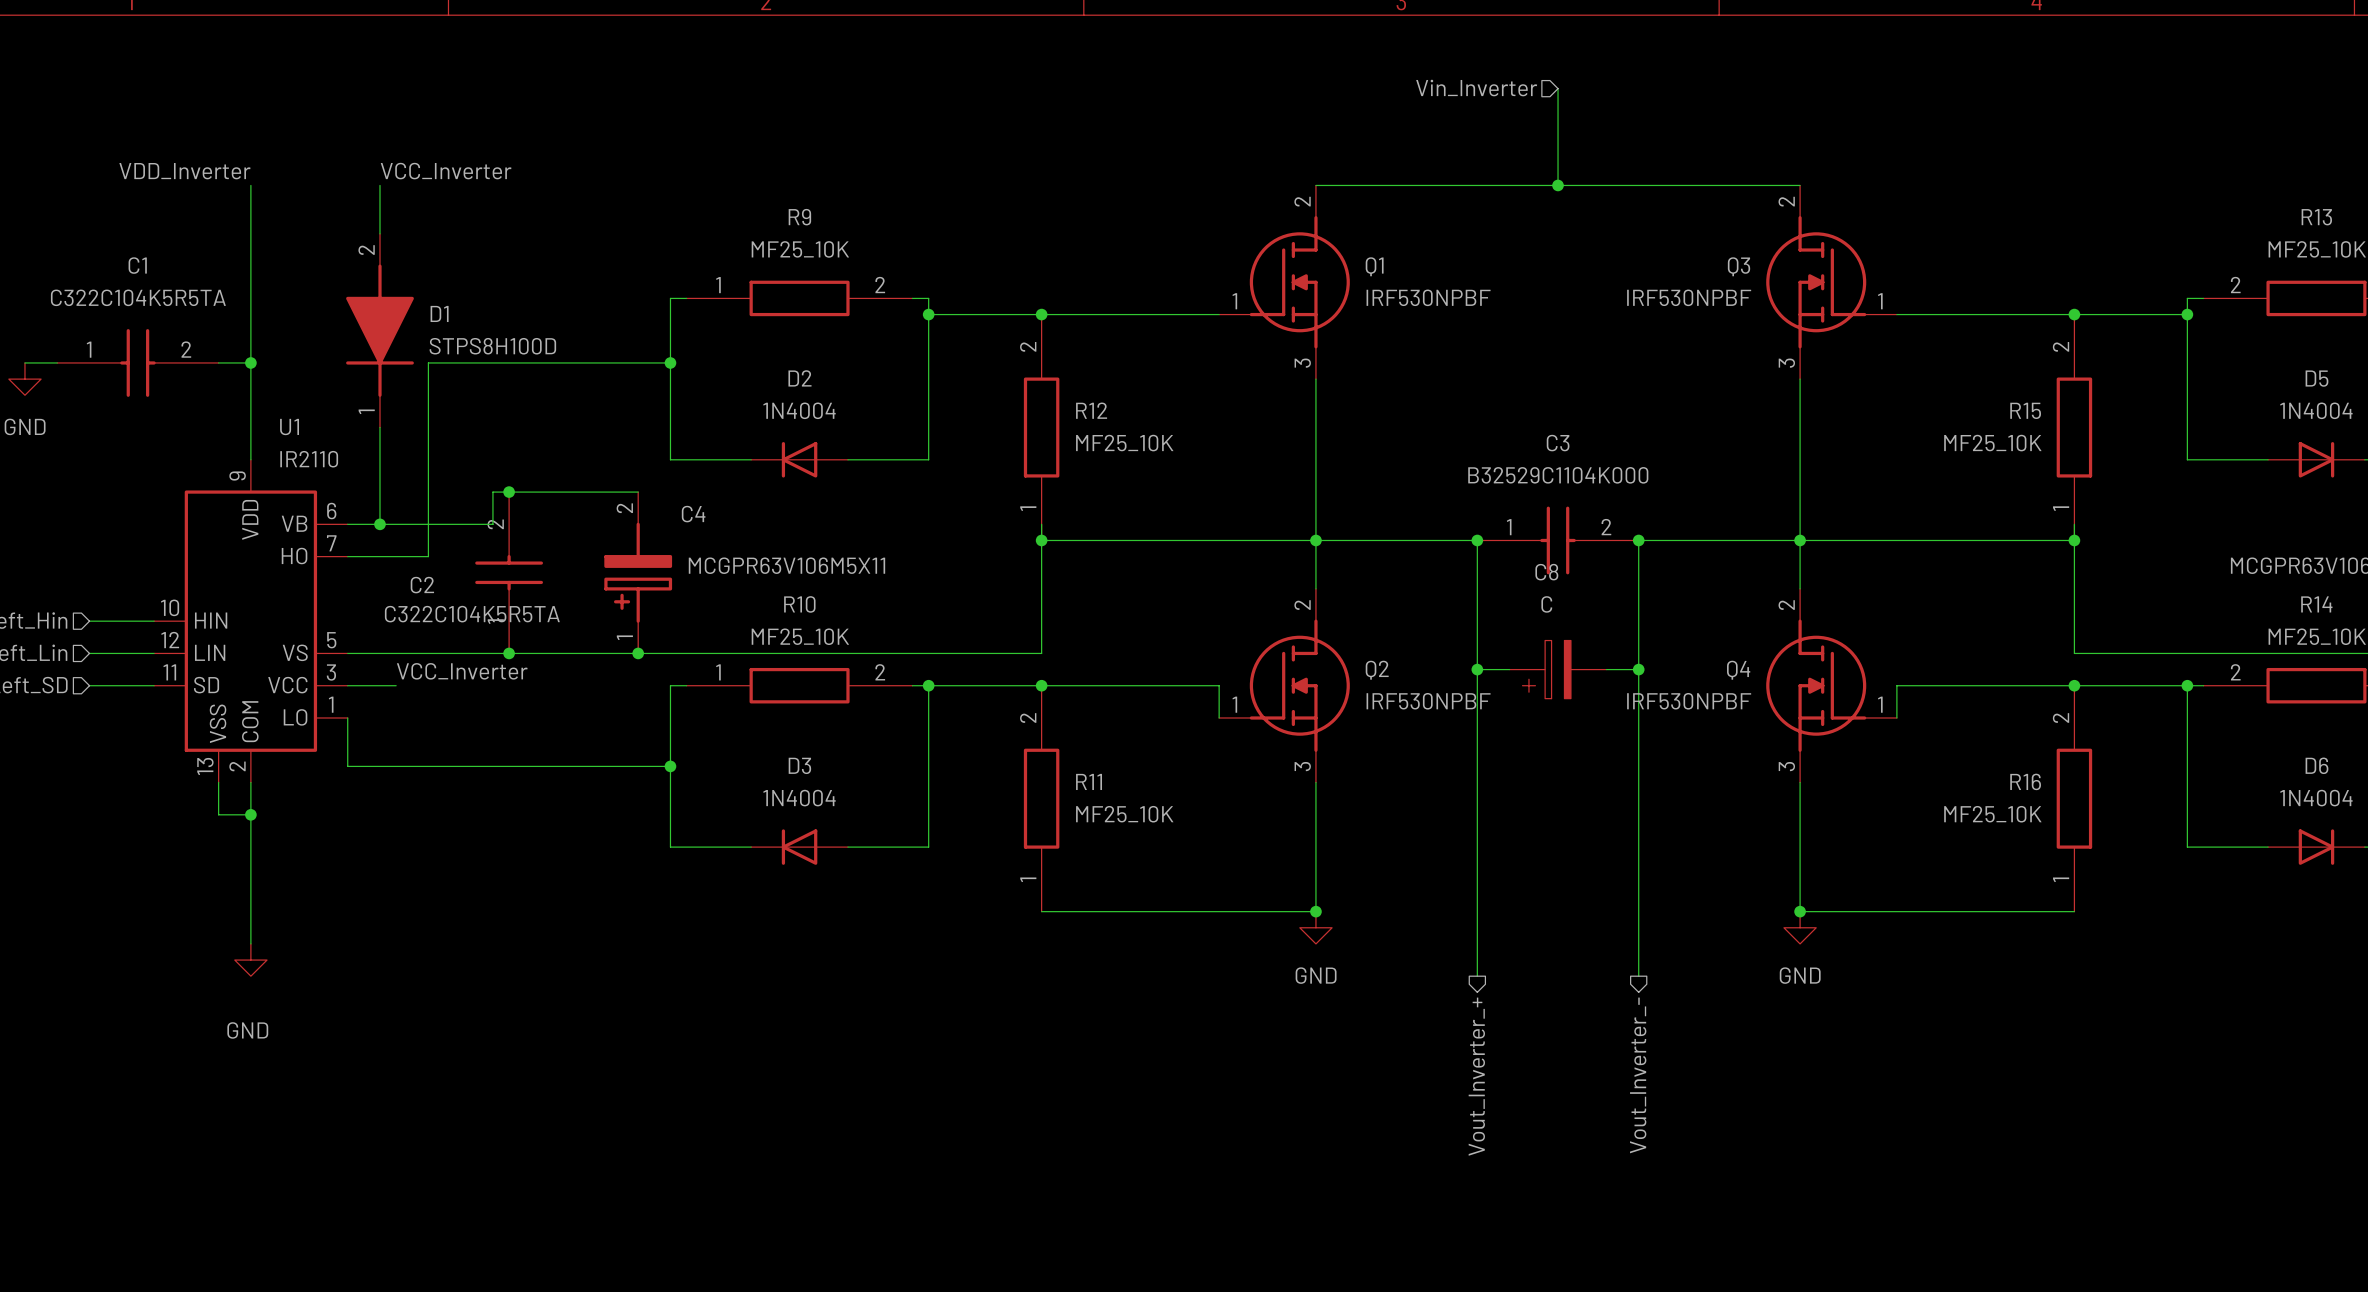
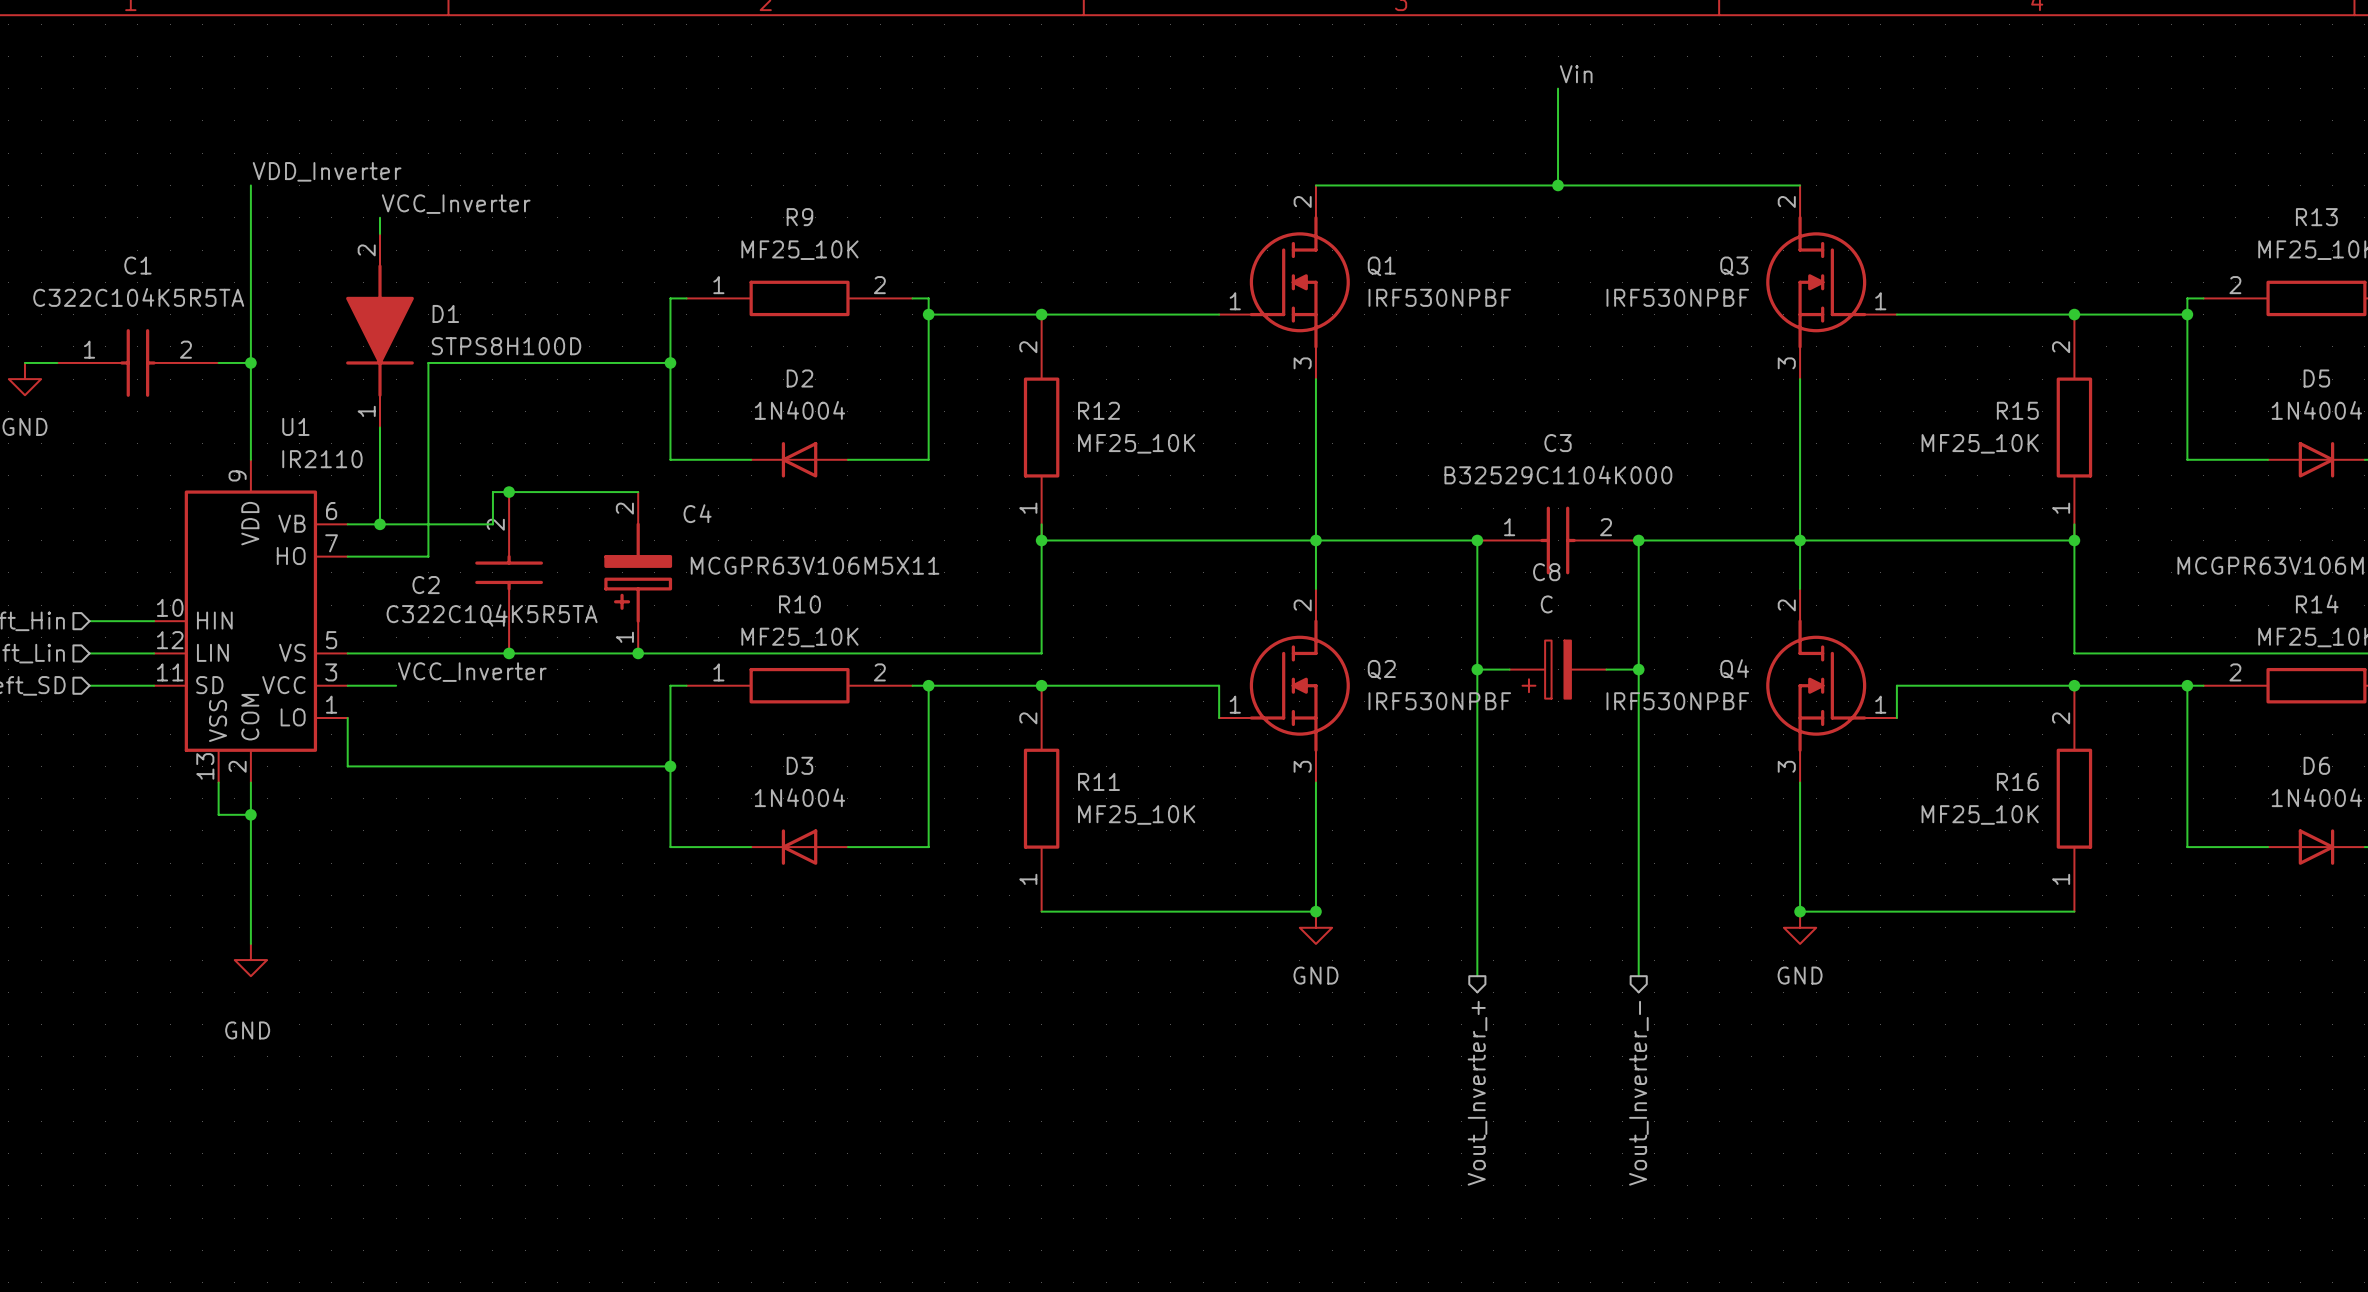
label: none -> Vin (1576, 74)
hierarchical label: Vin_Inverter (1476, 88) -> none
label position: VDD_Inverter (184, 171) -> VDD_Inverter (327, 171)
label position: VCC_Inverter (446, 171) -> VCC_Inverter (456, 204)
wire: (380, 185) (380, 217) -> none

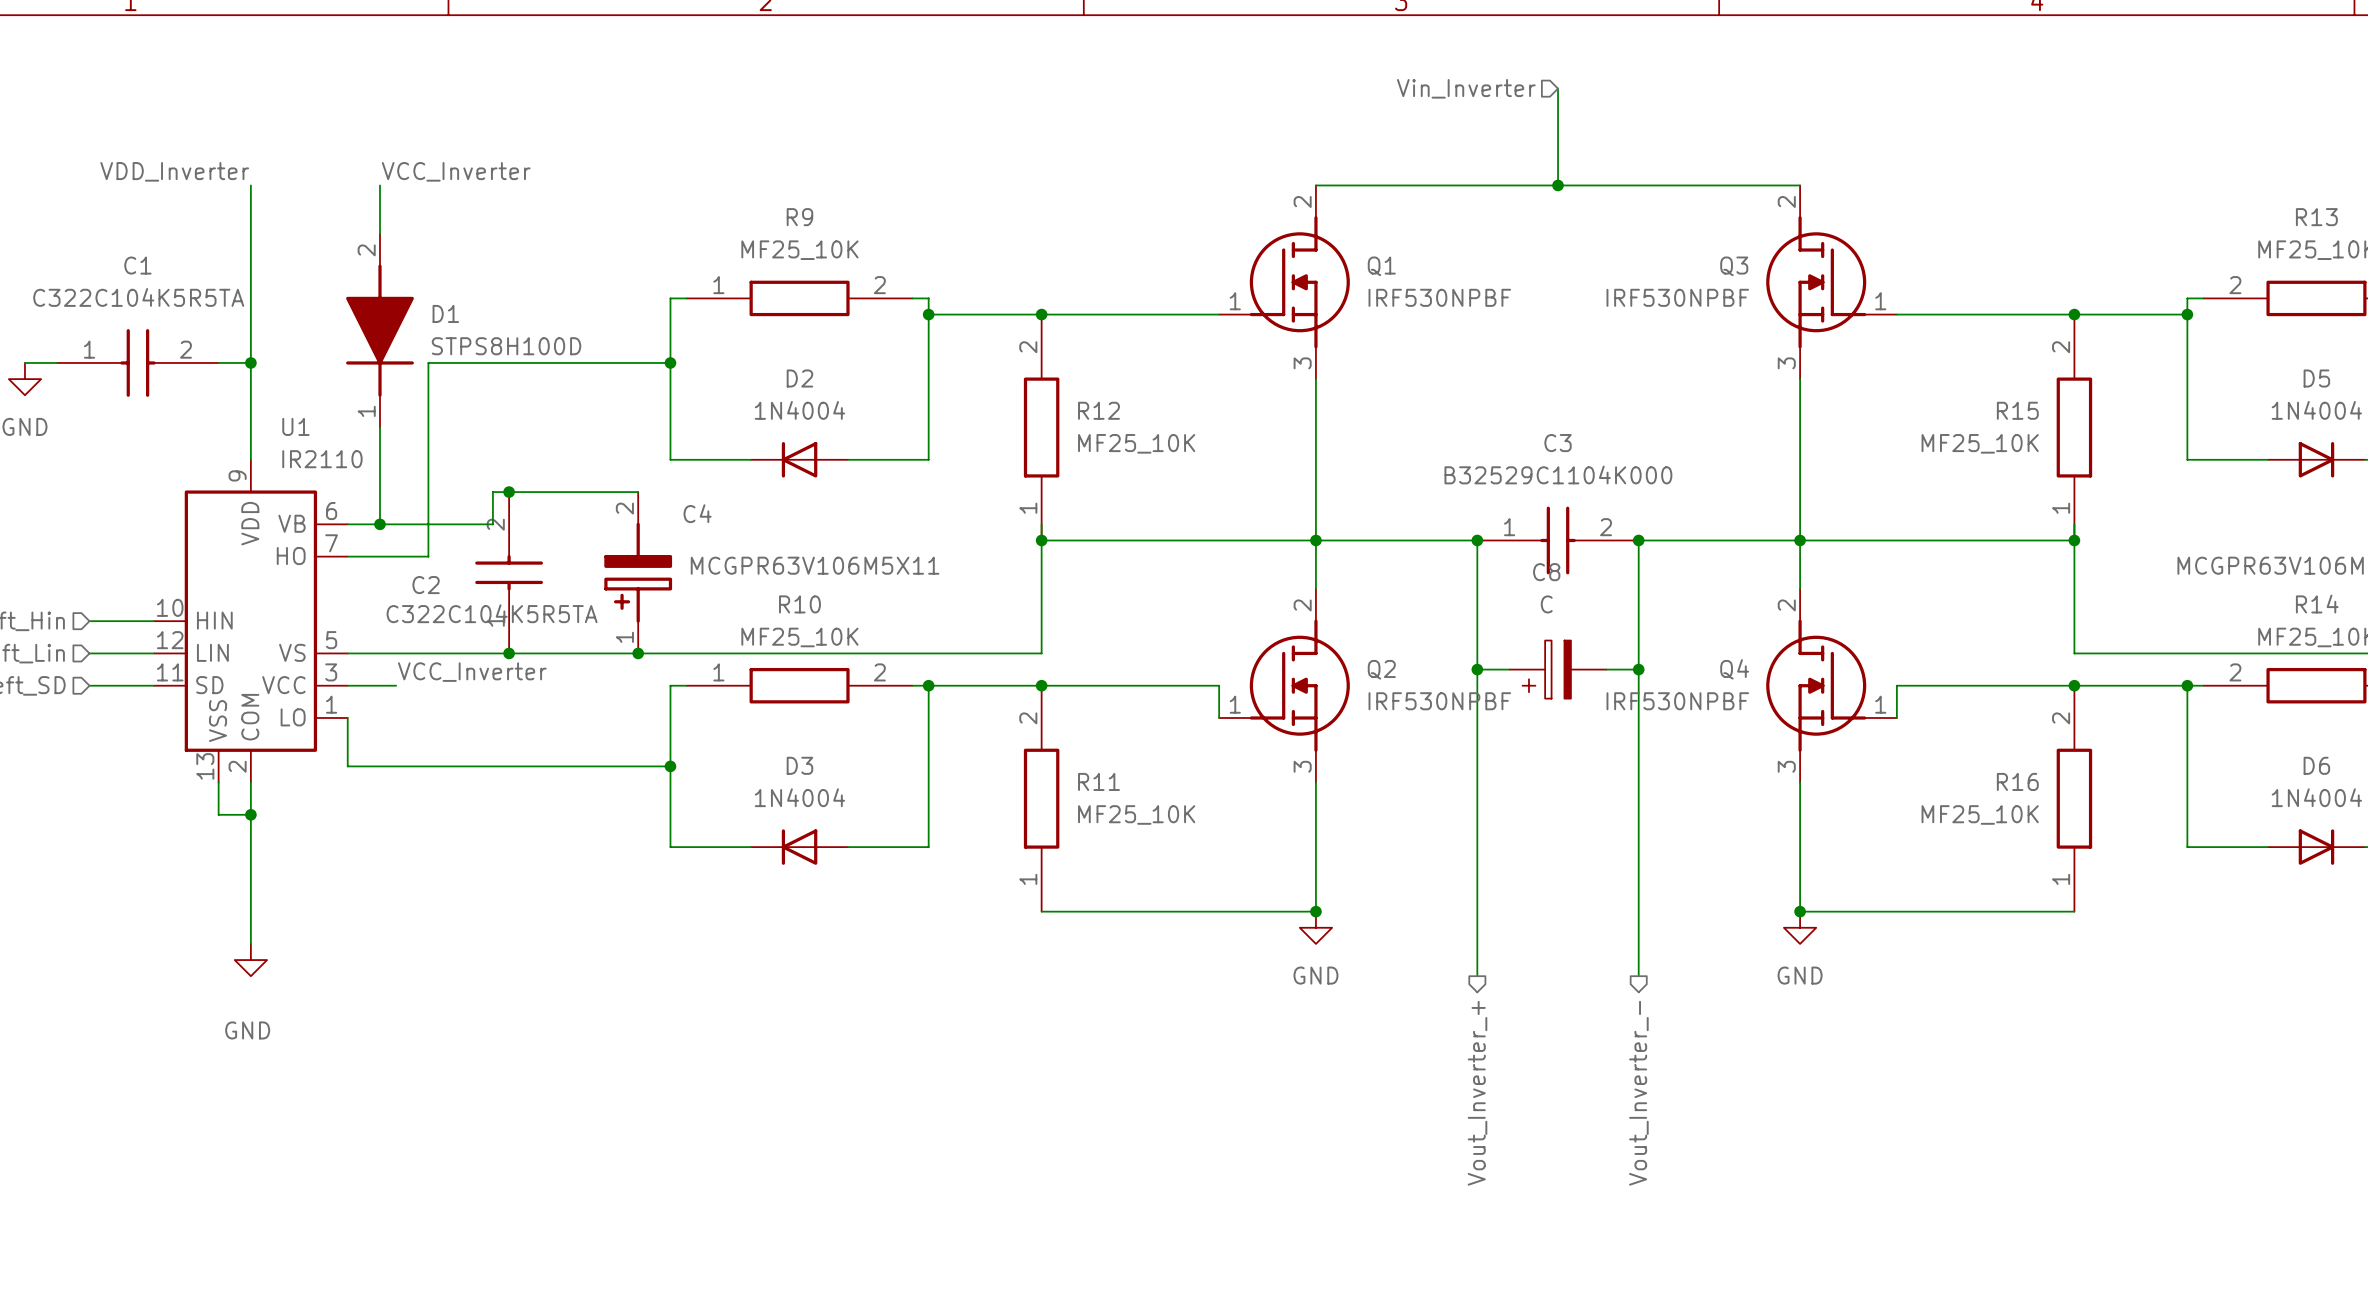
label: Vin (1576, 74) -> none
hierarchical label: none -> Vin_Inverter (1466, 88)
label position: VDD_Inverter (327, 171) -> VDD_Inverter (174, 171)
wire: none -> (380, 185) (380, 217)
label position: VCC_Inverter (456, 204) -> VCC_Inverter (456, 171)

